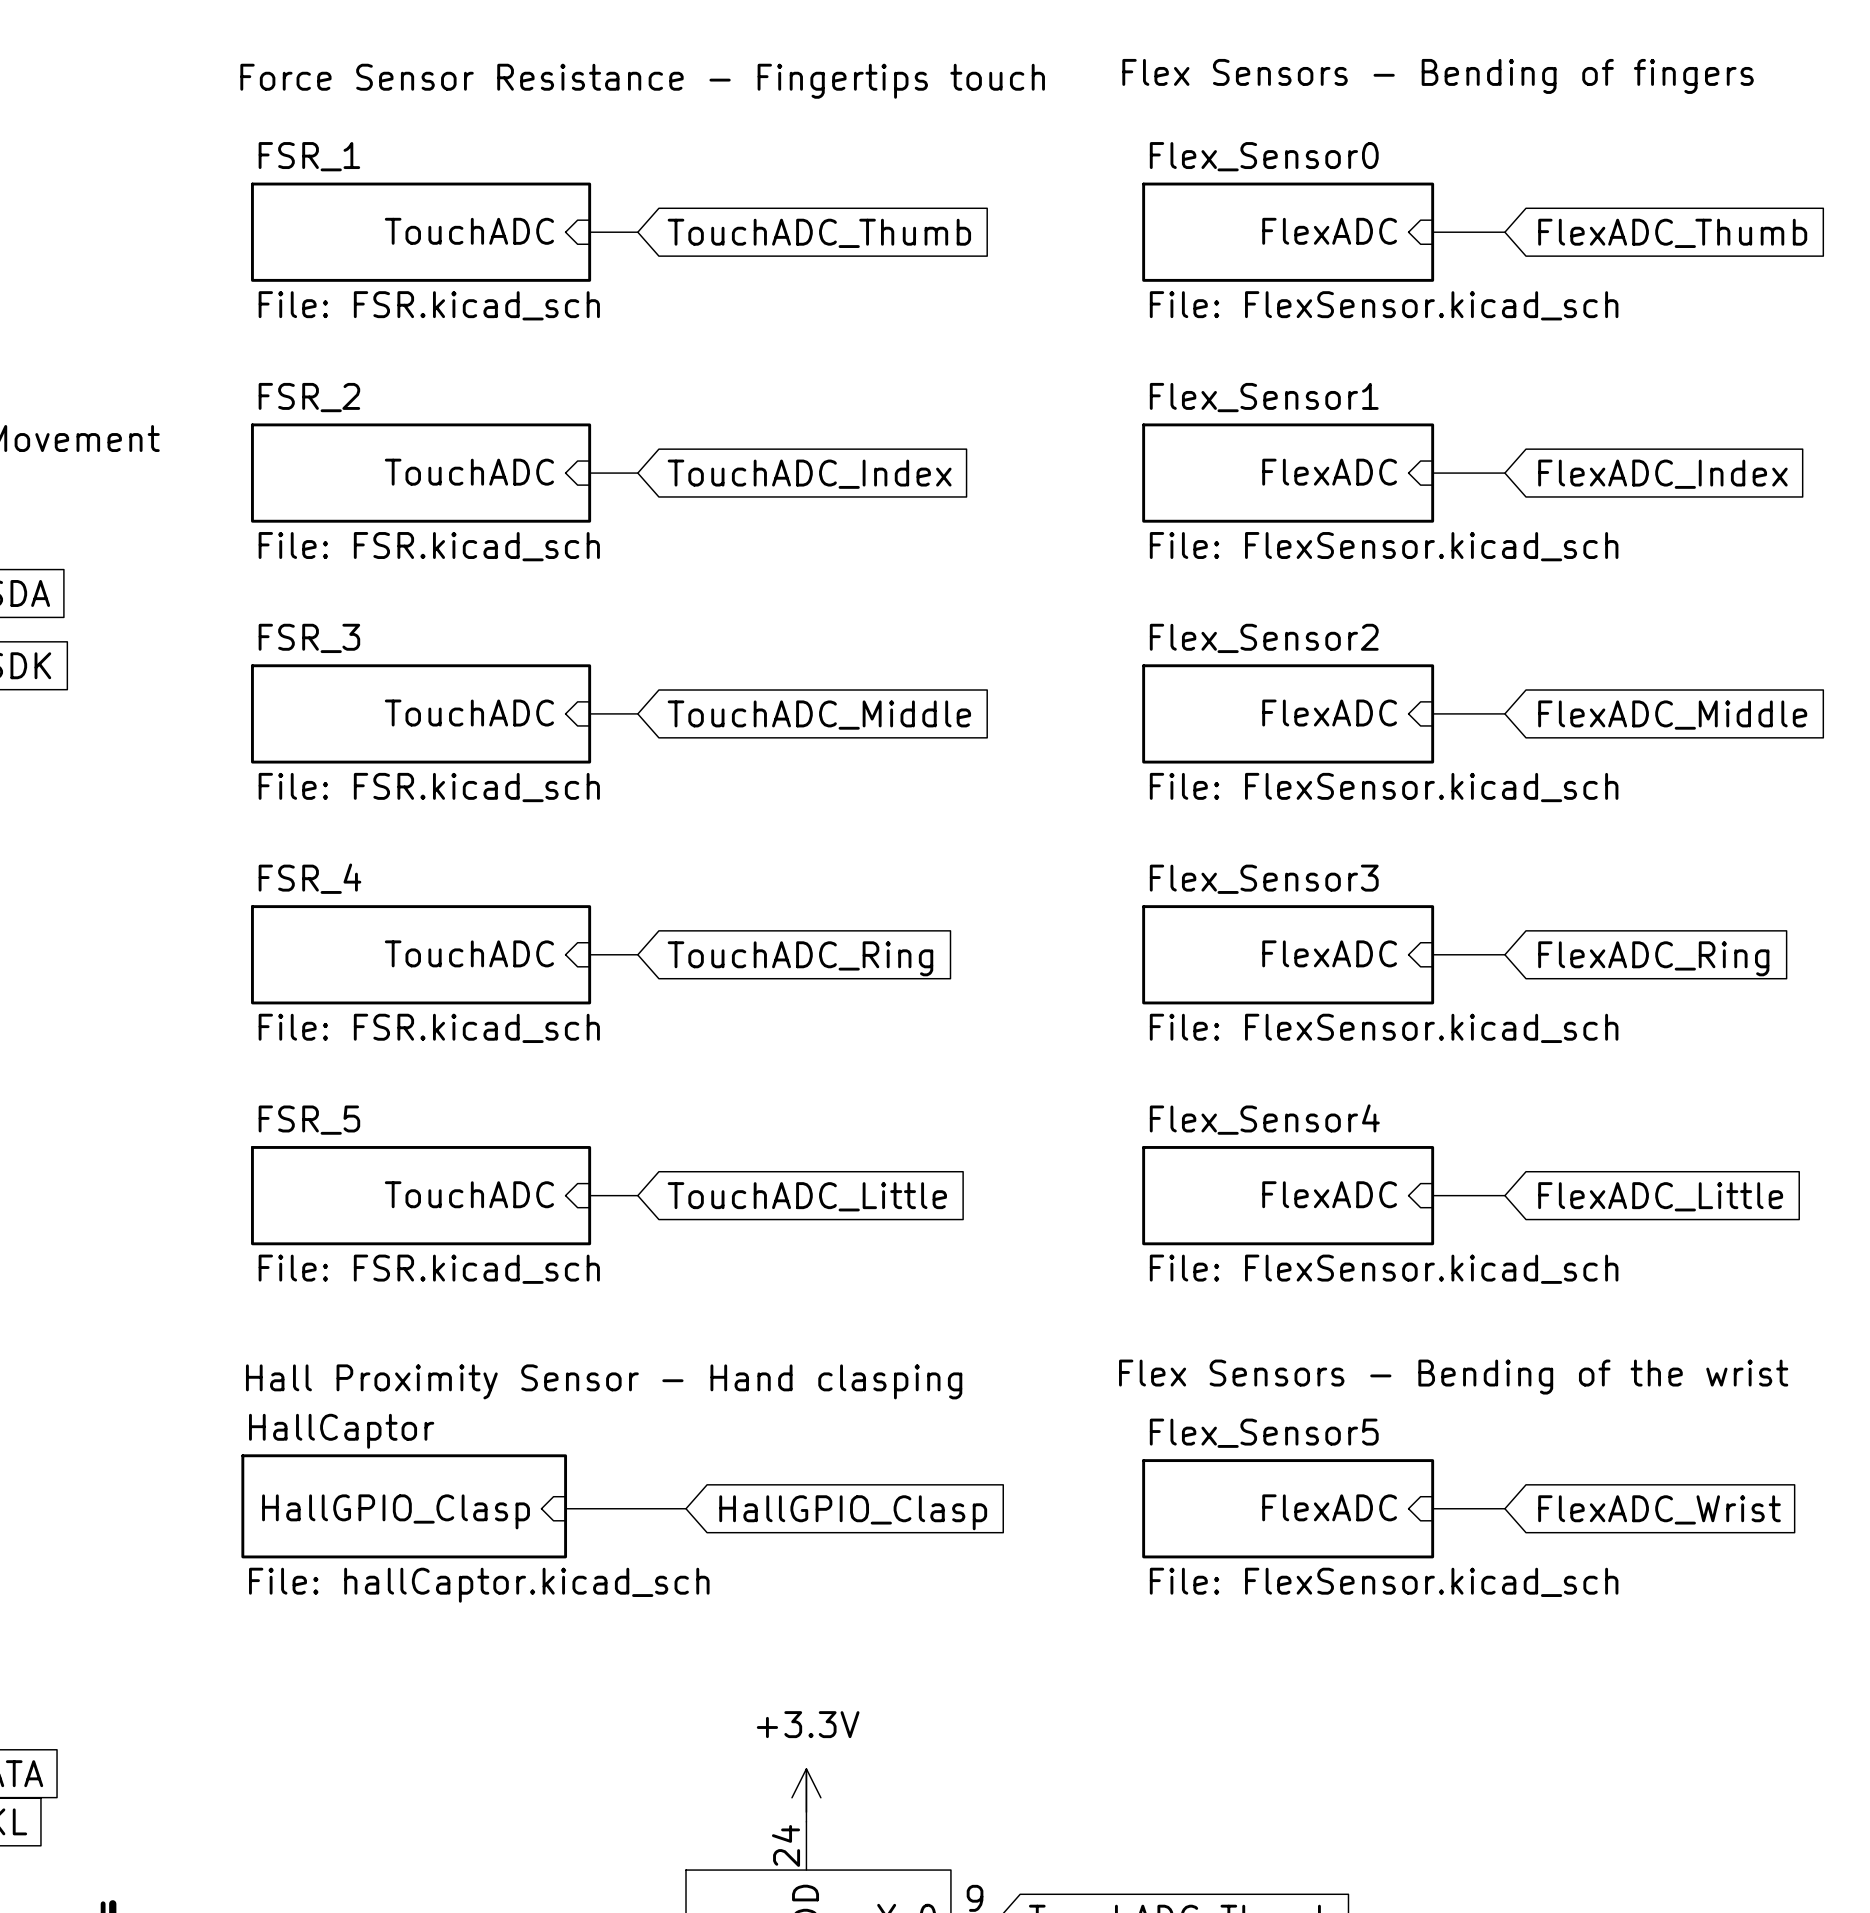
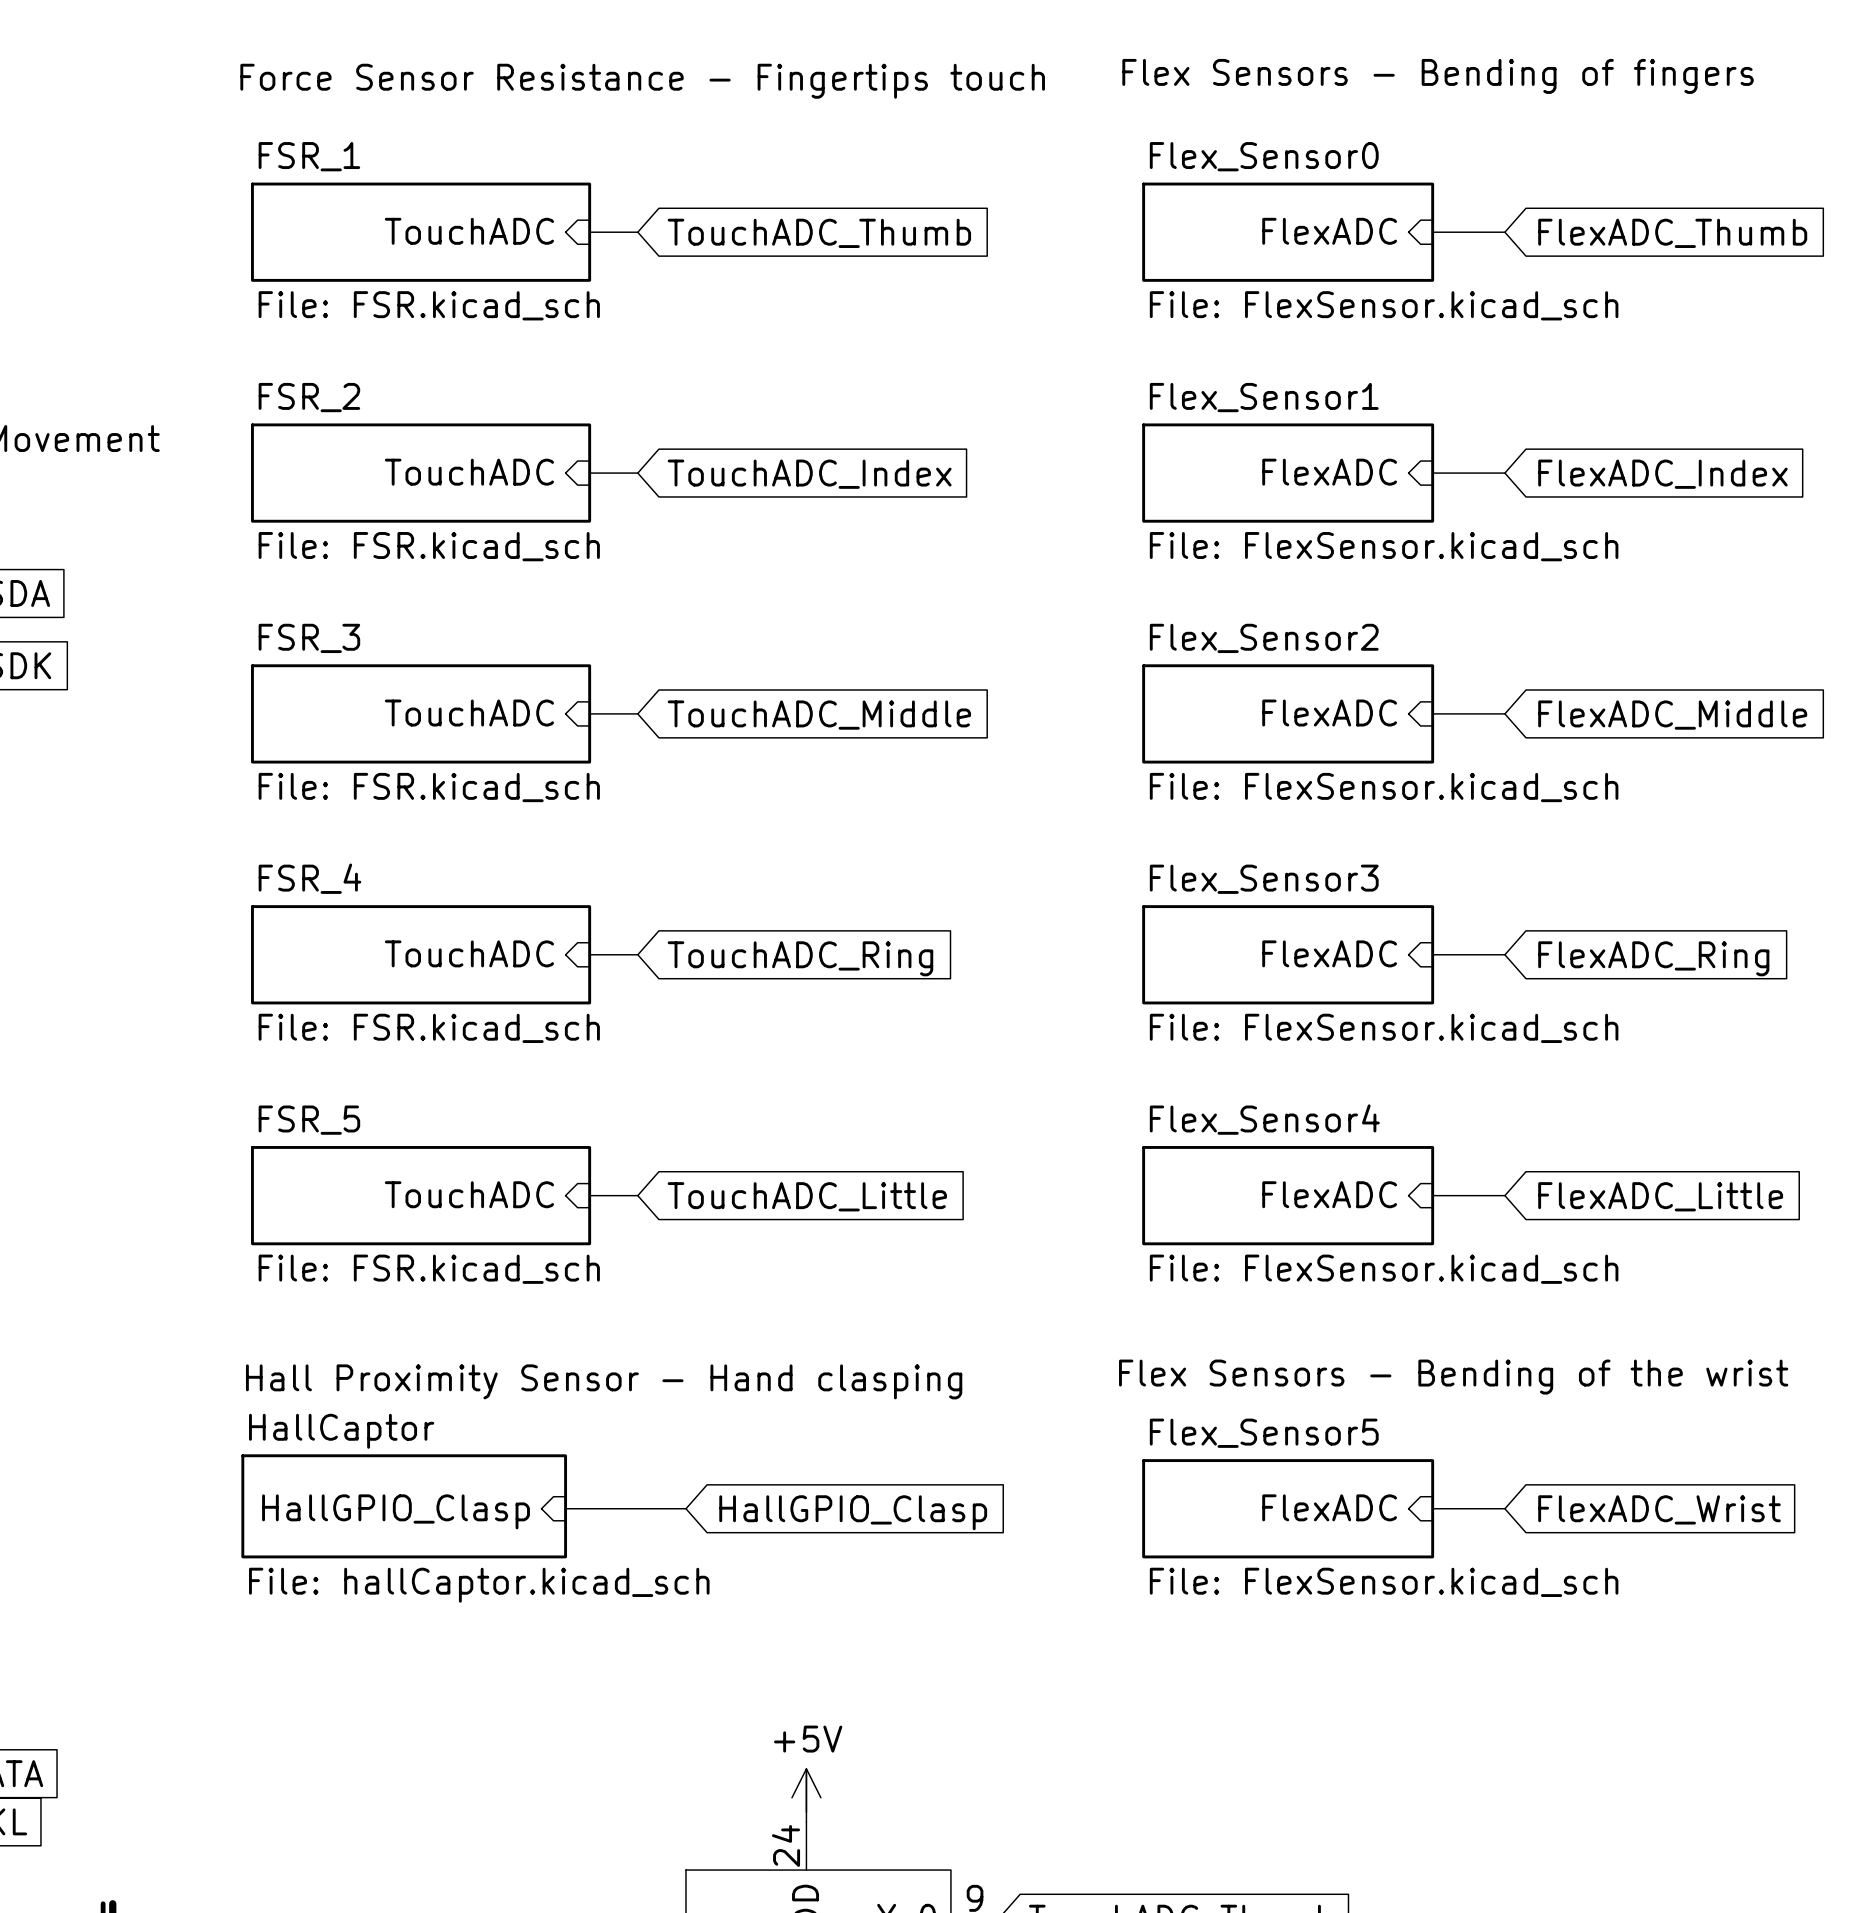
power symbol: +3.3V (806, 1795) -> +5V (806, 1795)

